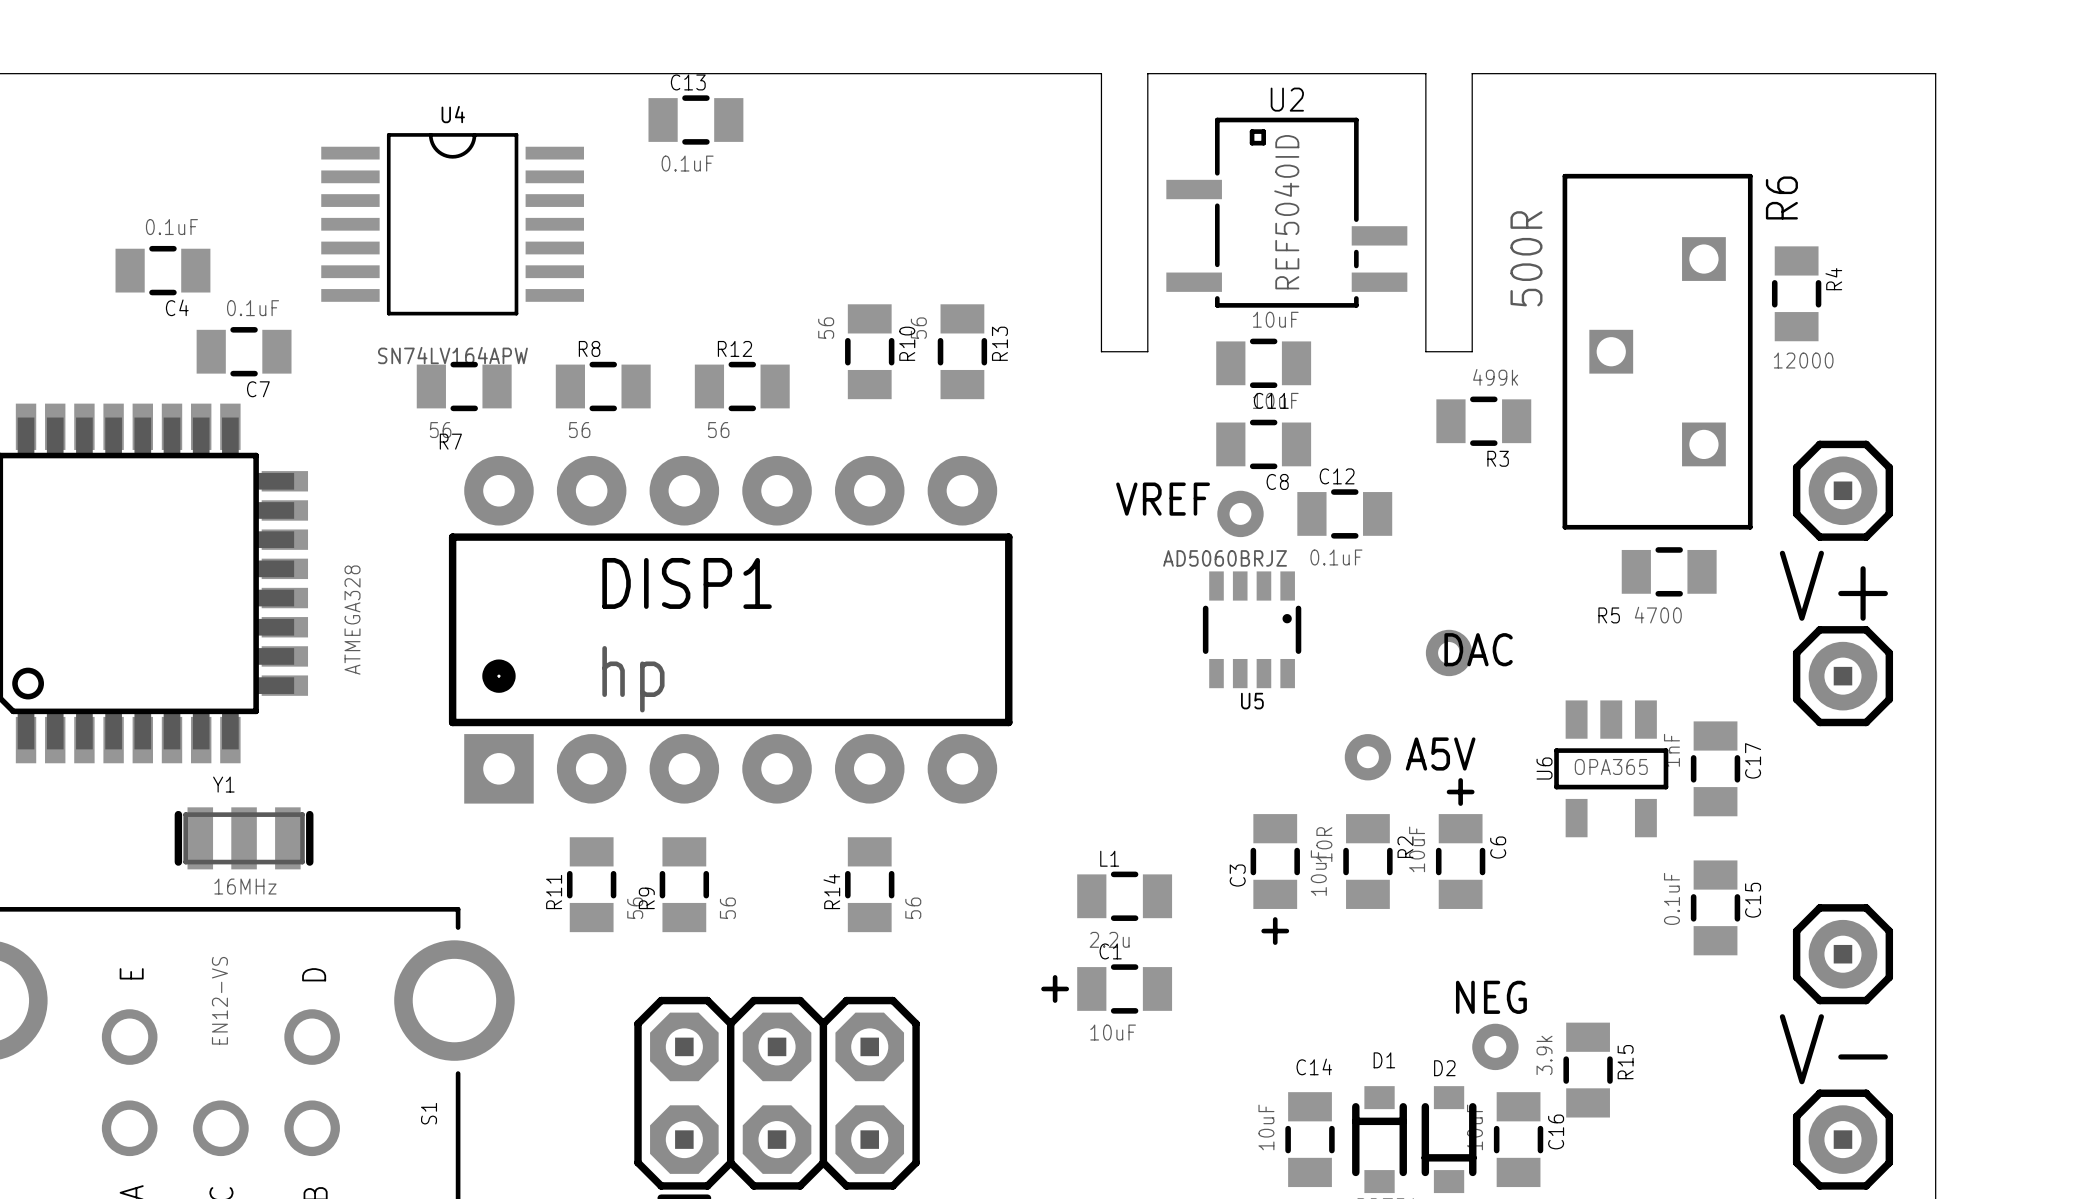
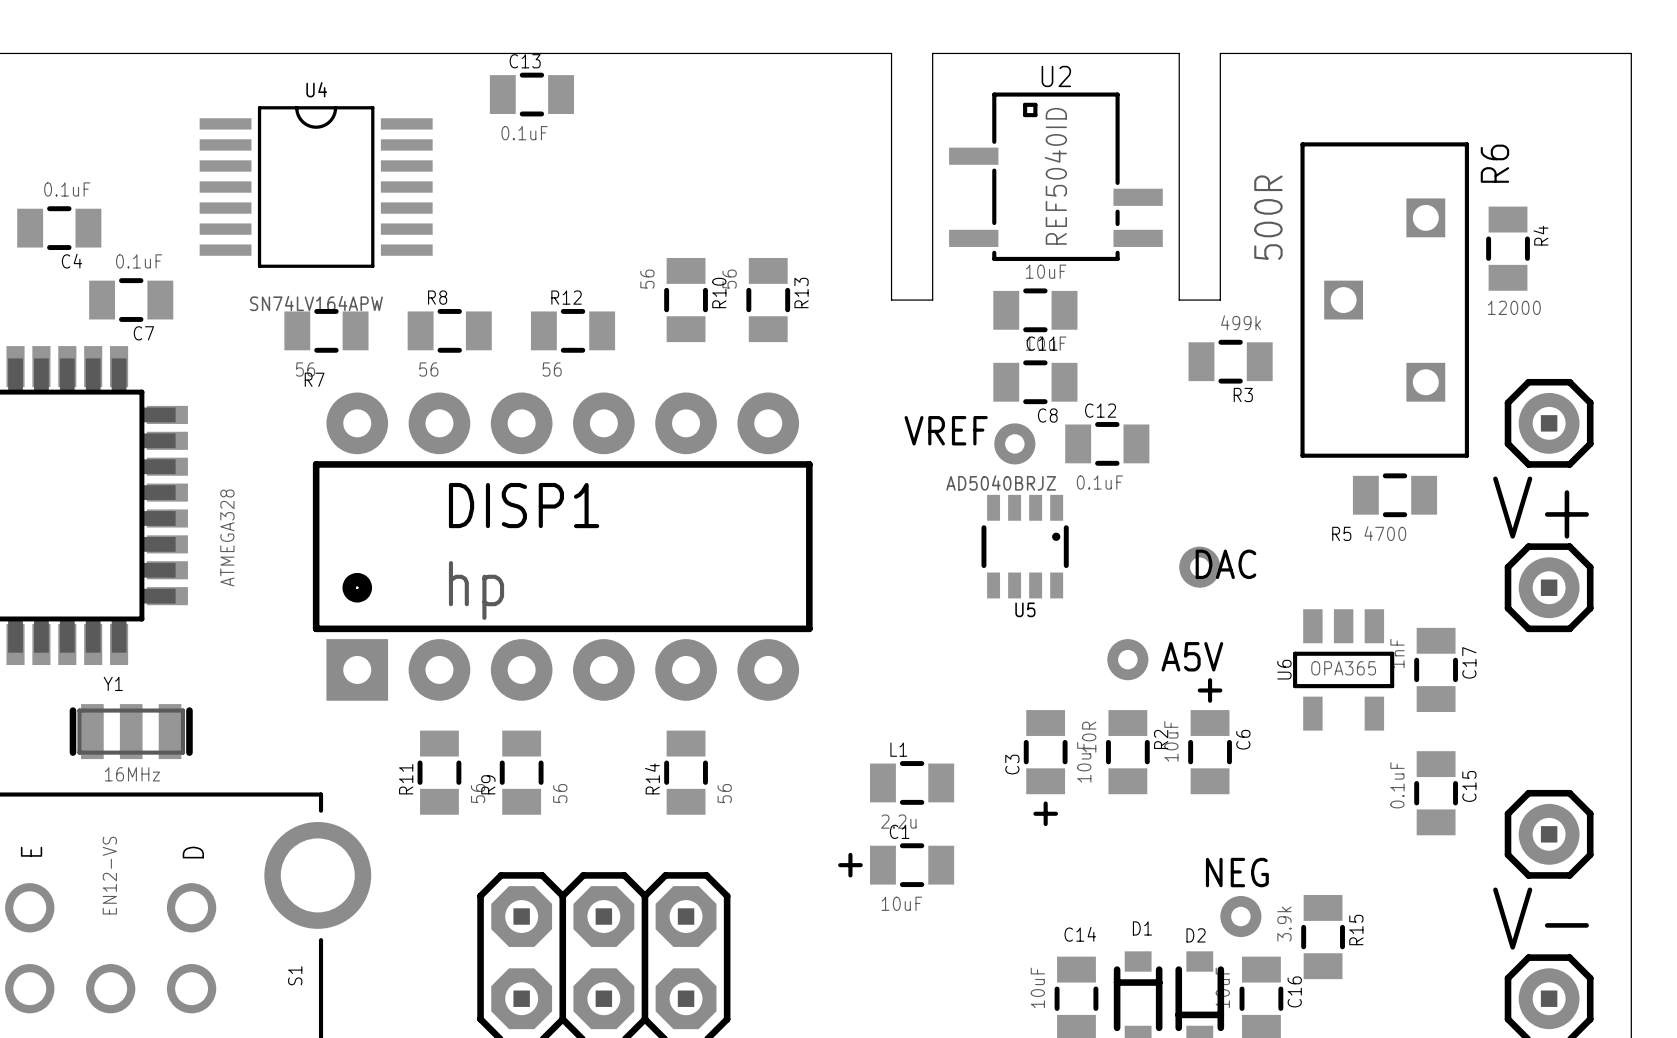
U5 value: AD5060BRJZ (1225, 558) -> AD5040BRJZ (1001, 483)

